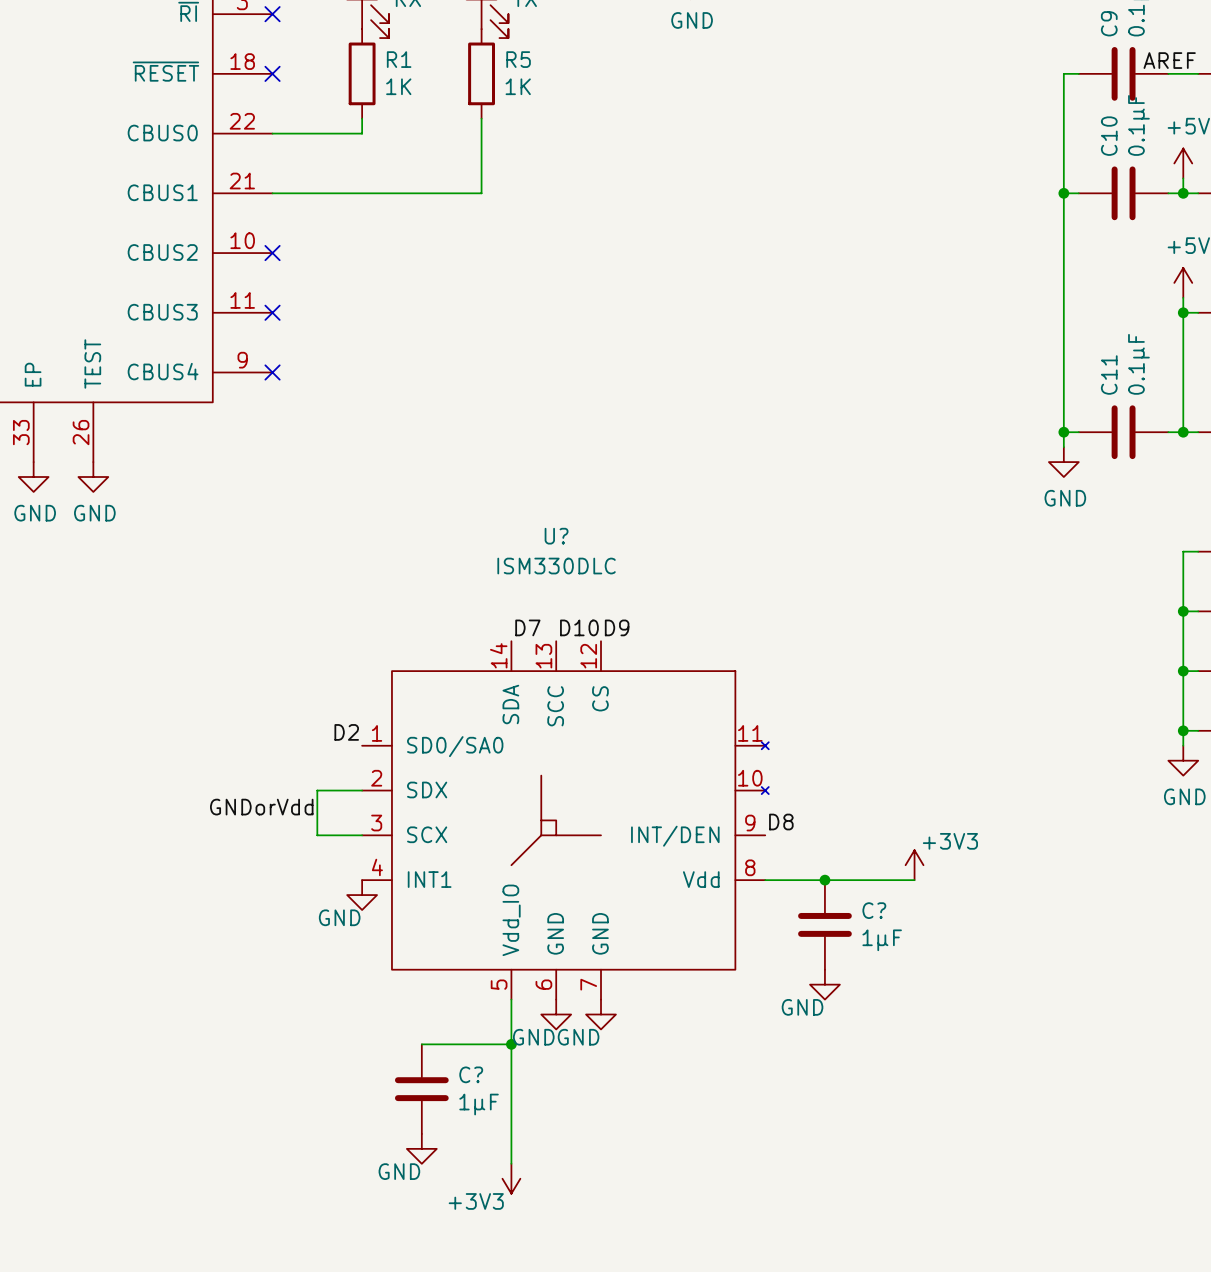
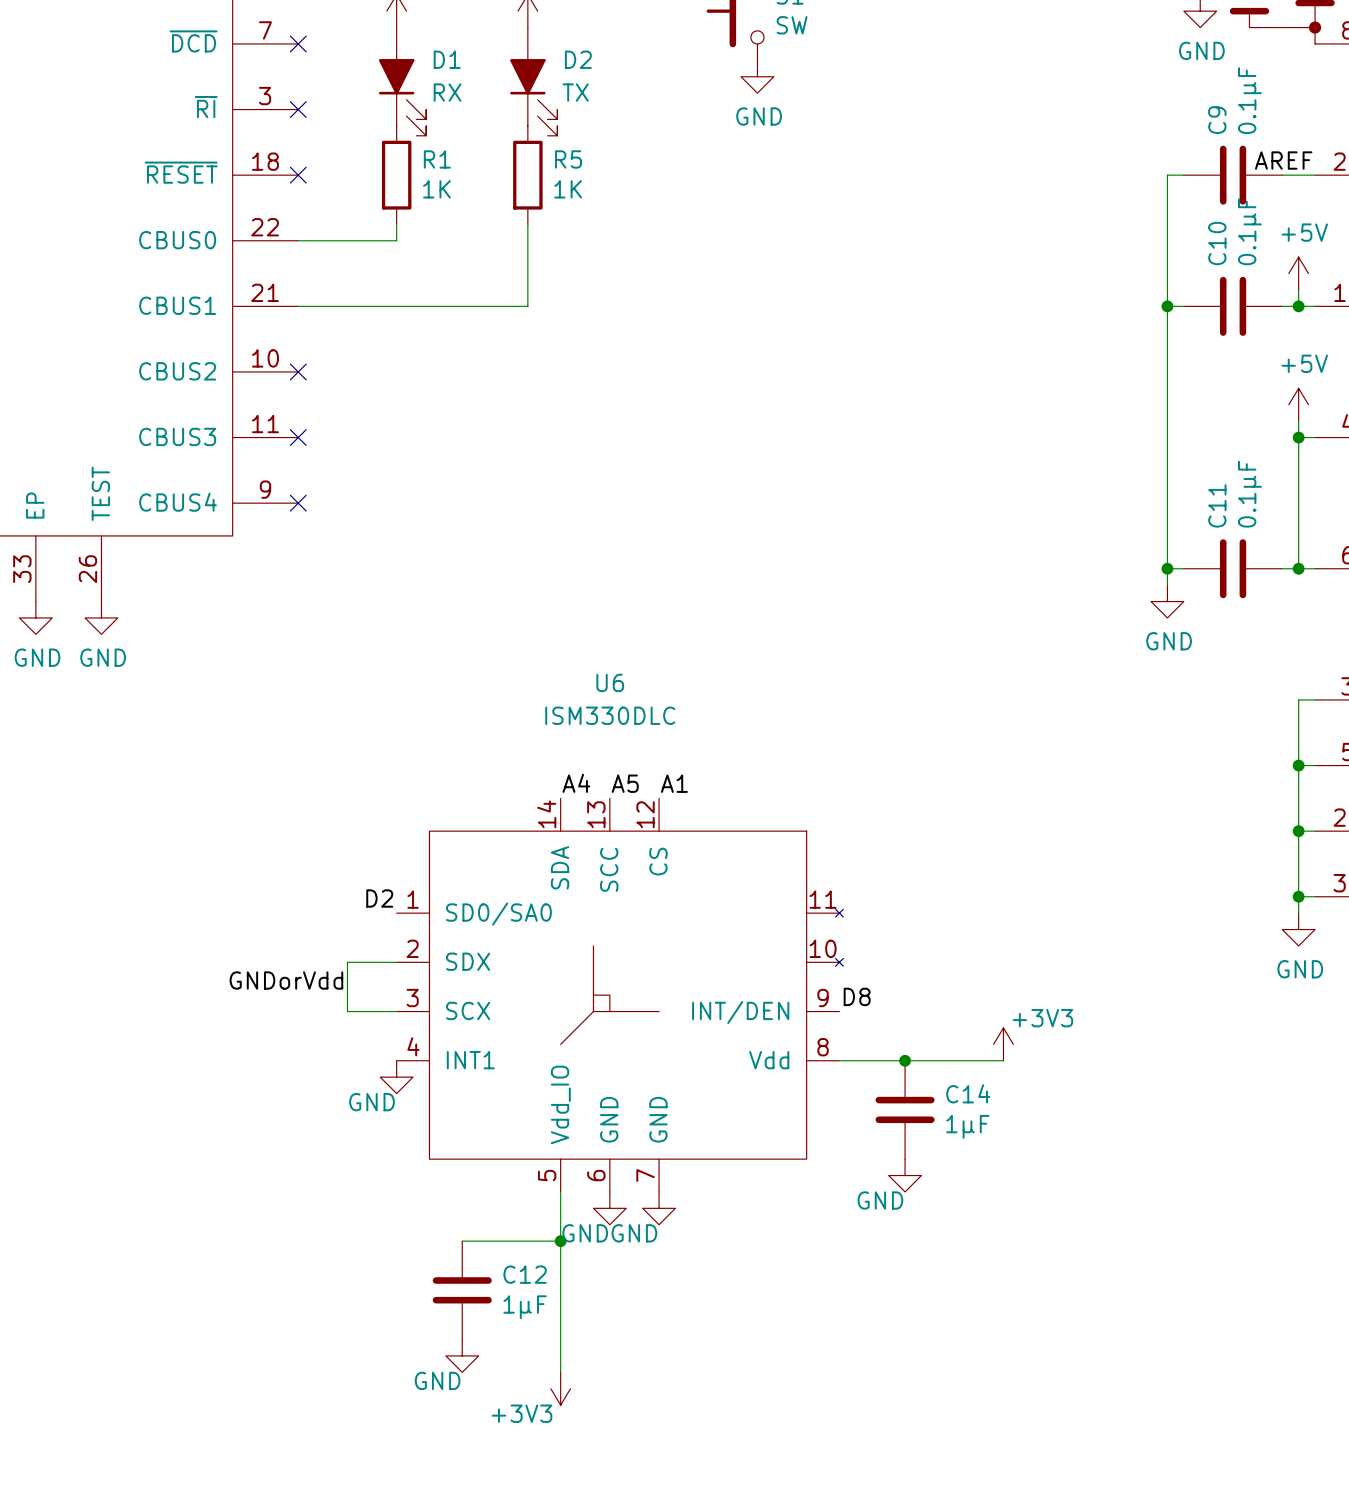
U? name: U? (556, 536) -> U6 (610, 682)
label: D7 (527, 627) -> A4 (576, 783)
label: D10 (579, 627) -> A5 (625, 783)
label: D9 (617, 627) -> A1 (674, 783)
C? name: C? (874, 910) -> C14 (968, 1093)
C? name: C? (471, 1074) -> C12 (525, 1274)

